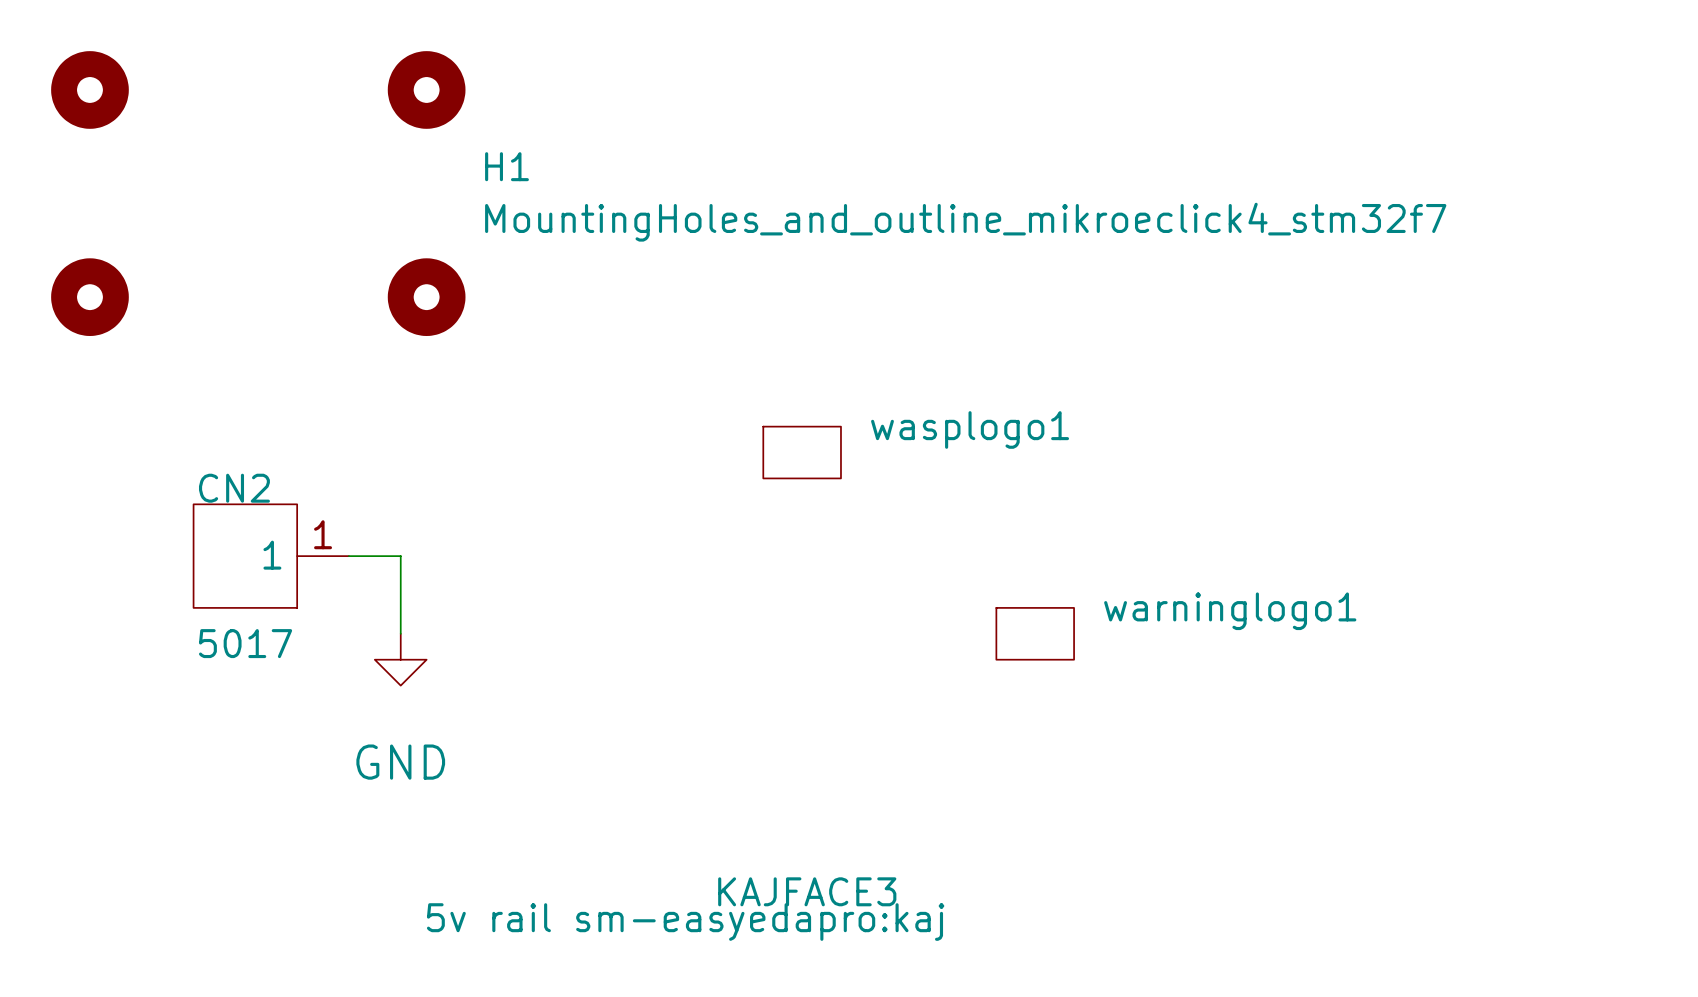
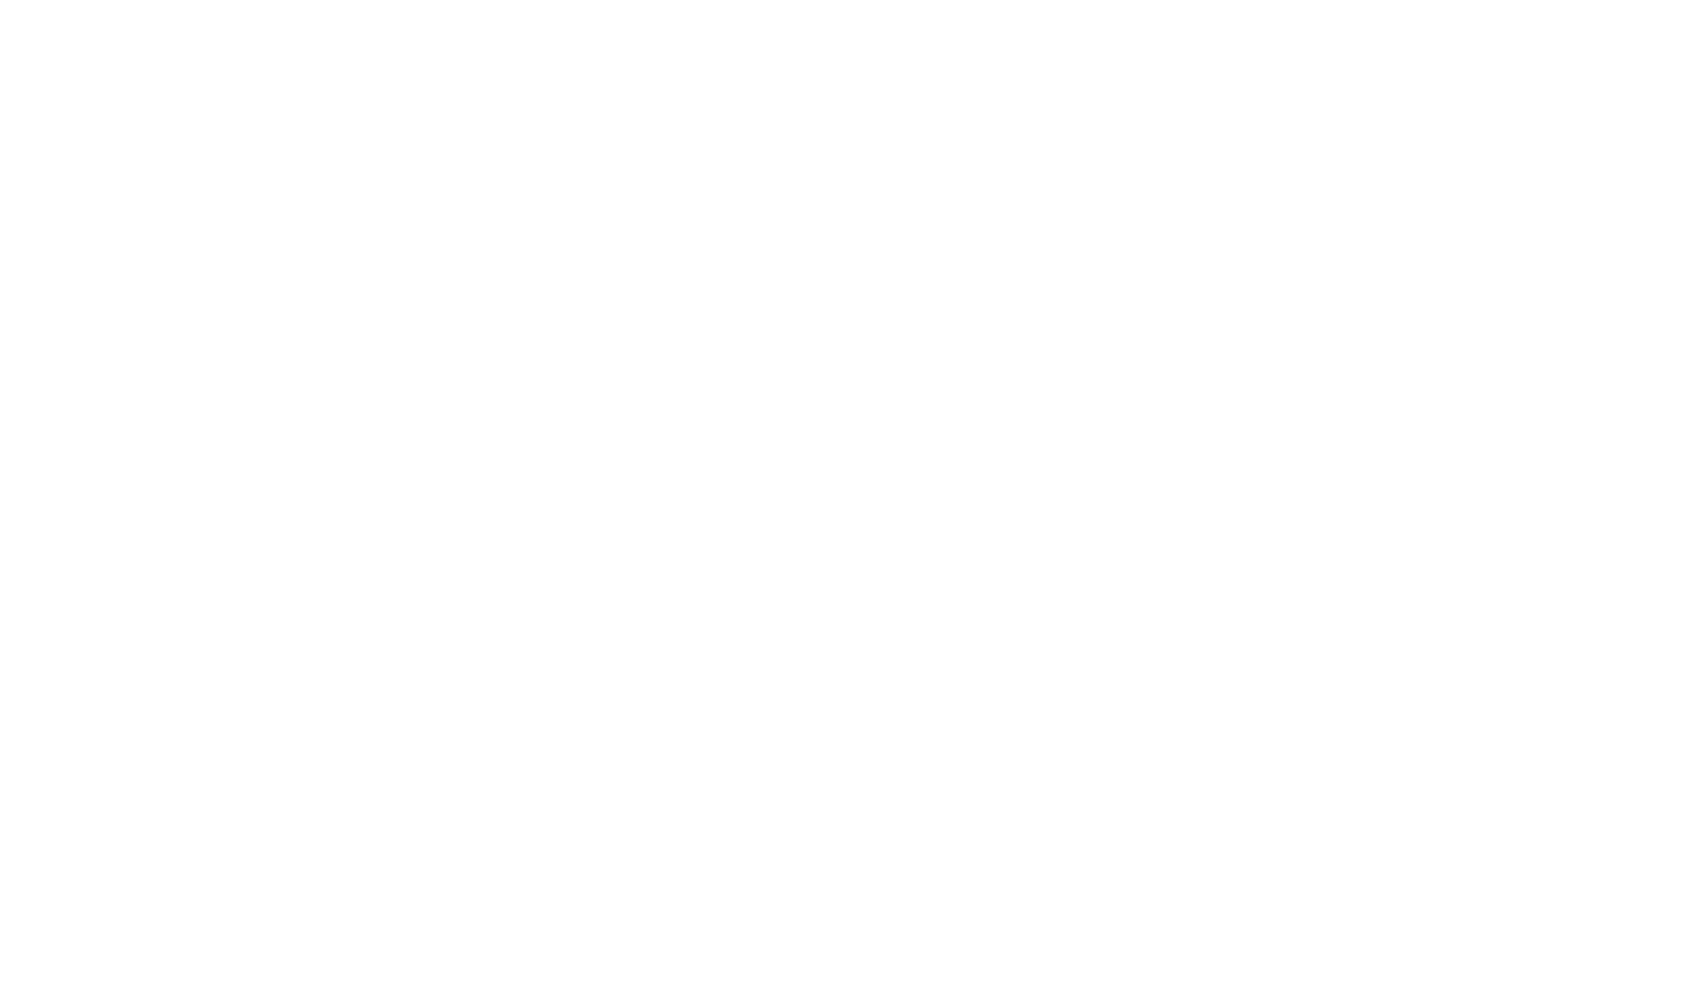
H1: MountingHoles_and_outline_mikroeclick4_stm32f7 (258, 193) -> none
wasplogo1: (802, 452) -> none
CN2: 5017 (271, 556) -> none
wire: (348, 556) (400, 556) (400, 633) -> none
warninglogo1: (1035, 633) -> none
power symbol: GND (400, 659) -> none
KAJFACE3: (685, 909) -> none

